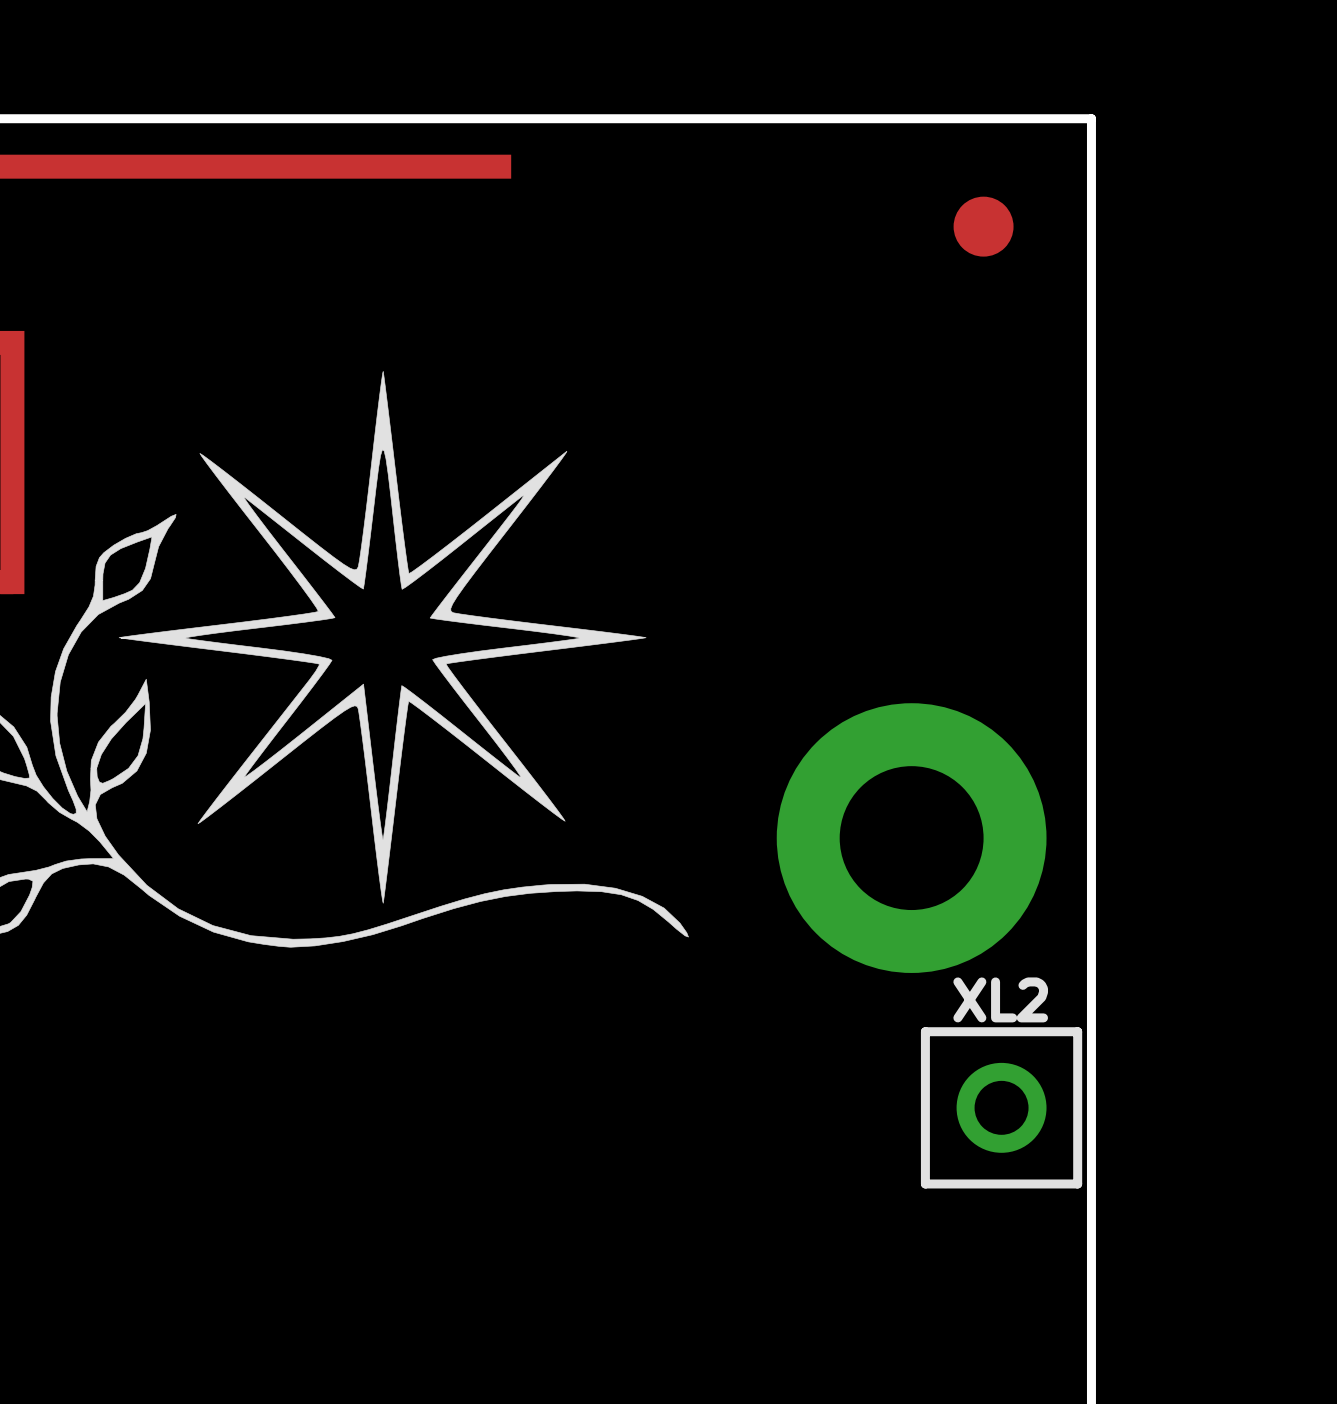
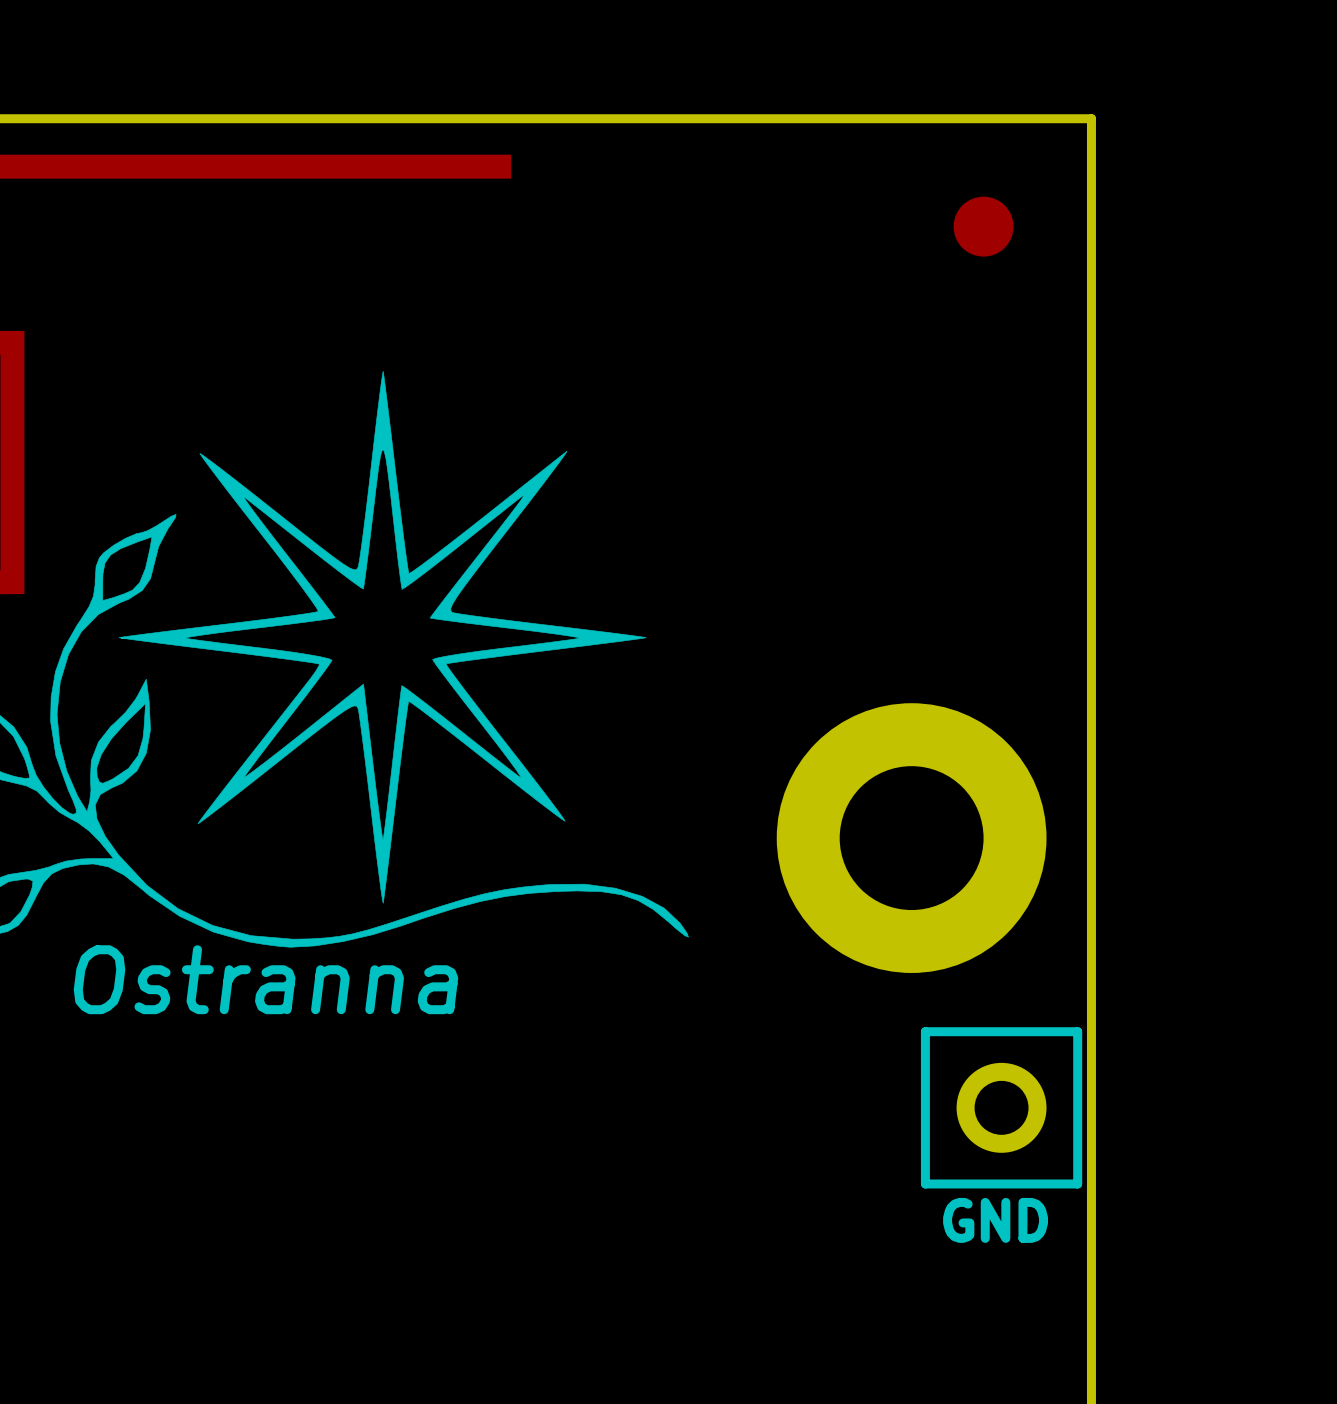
text: none -> Ostranna (265, 979)
XL2 name: XL2 (1000, 999) -> none
text: none -> GND (995, 1220)

